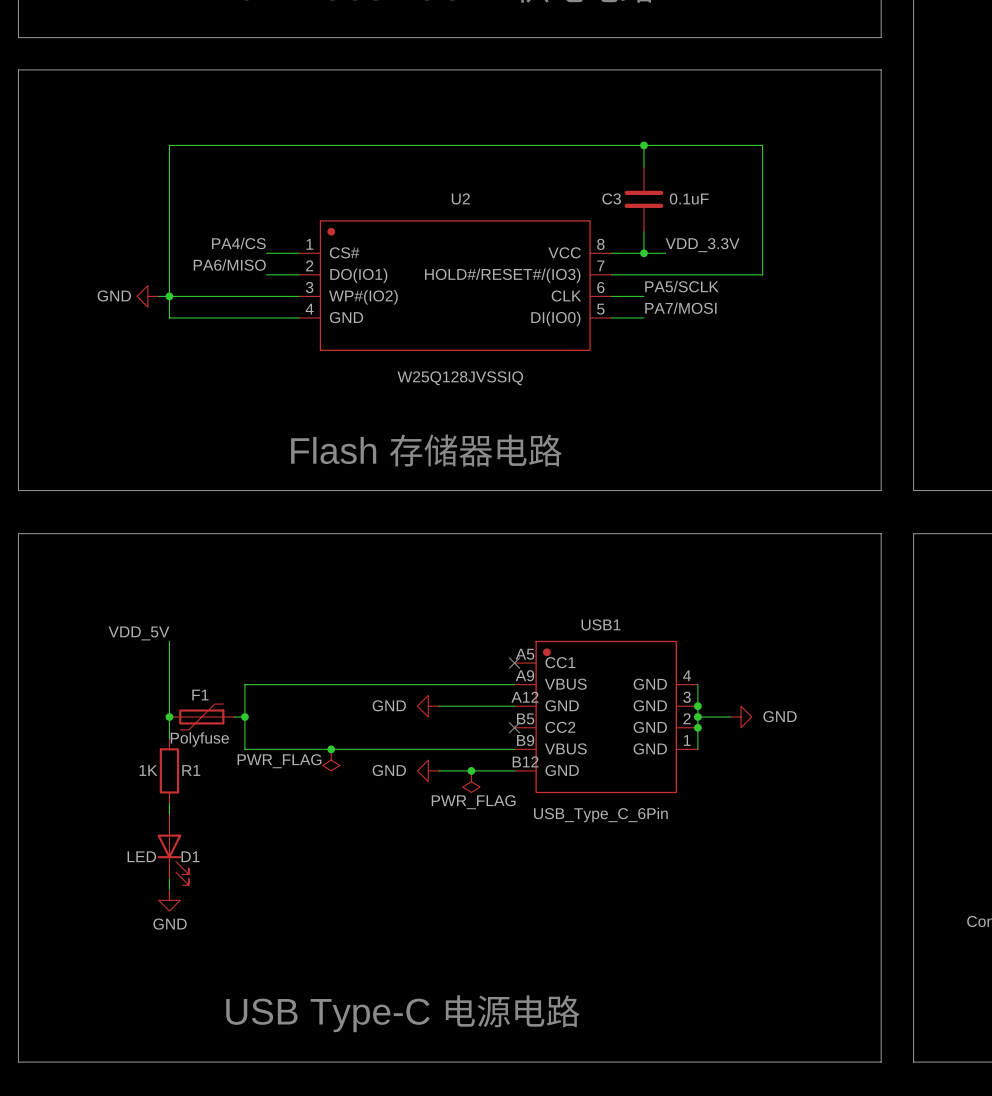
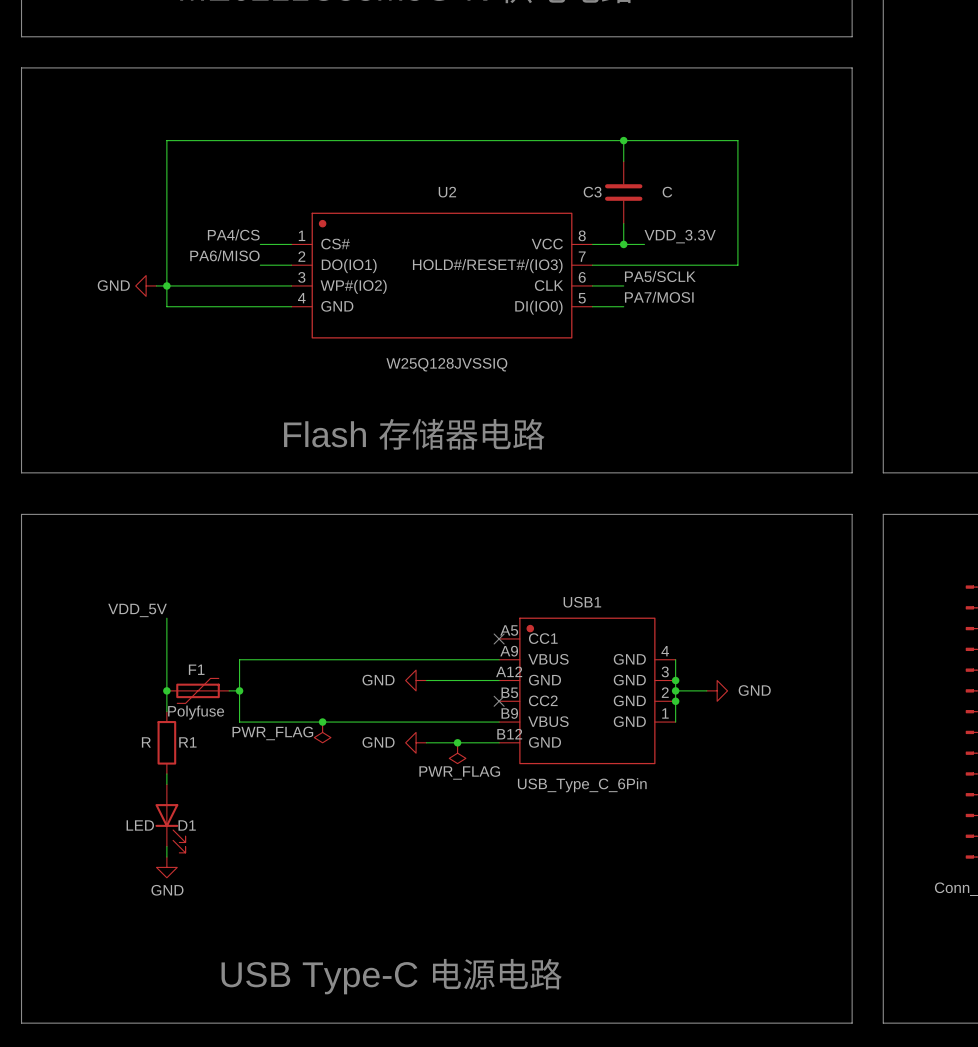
C3 value: 0.1uF (689, 198) -> C (667, 192)
R1 value: 1K (148, 770) -> R (146, 742)

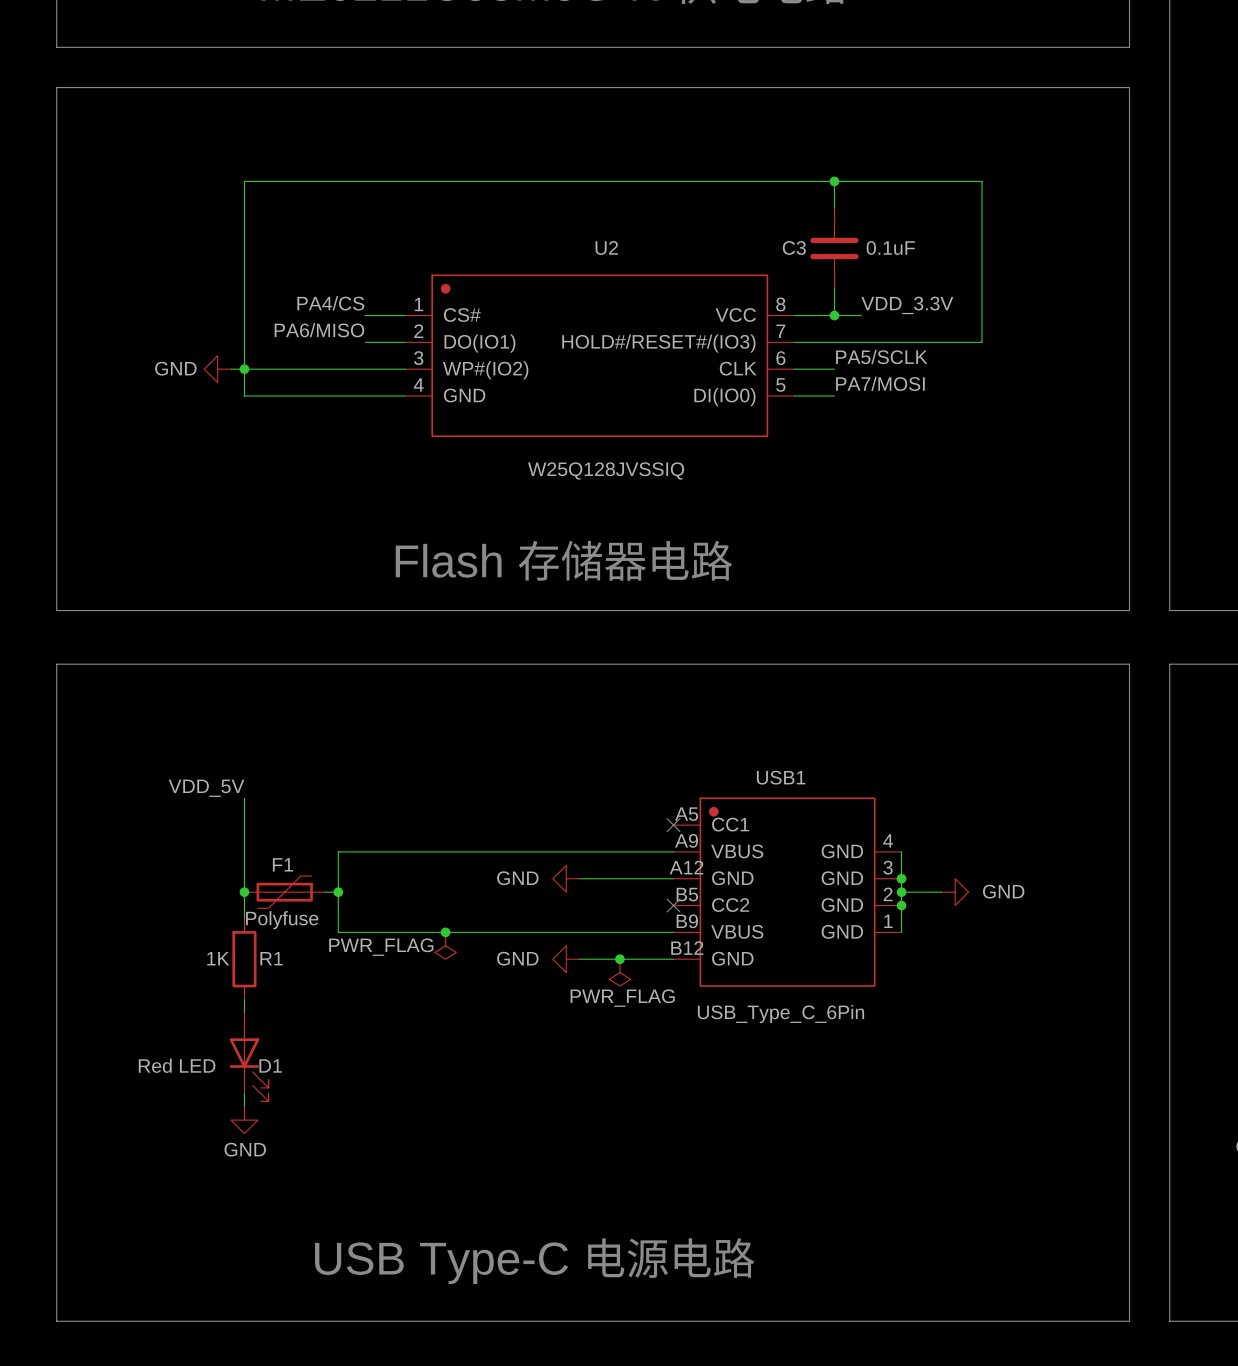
C3 value: C (667, 192) -> 0.1uF (890, 247)
R1 value: R (146, 742) -> 1K (218, 958)
D1 value: LED (140, 825) -> Red LED (177, 1065)

